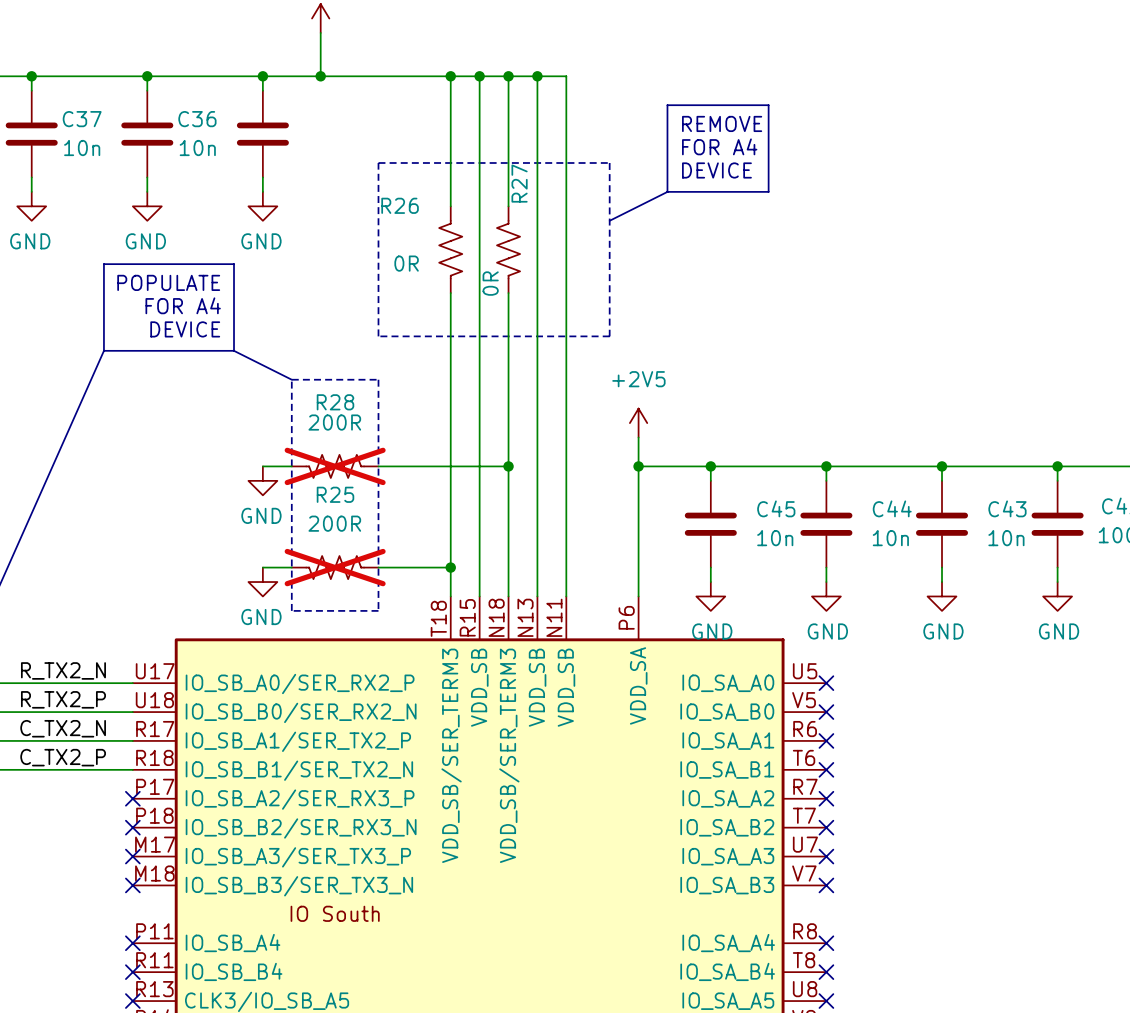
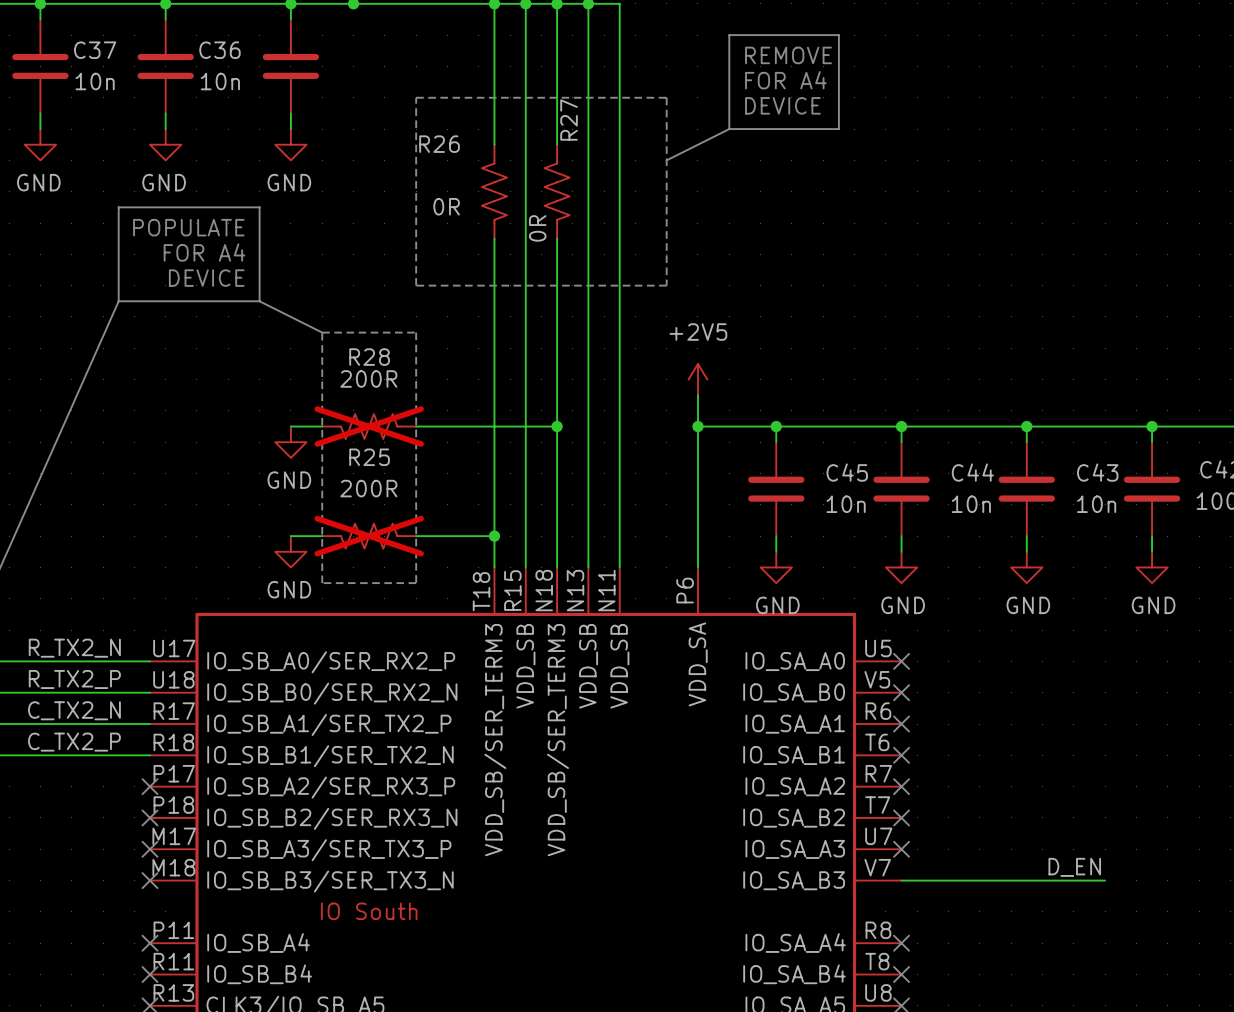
label: none -> D_EN (1074, 867)
wire: none -> (901, 880) (1105, 880)
no-connect mark: (826, 885) -> none

